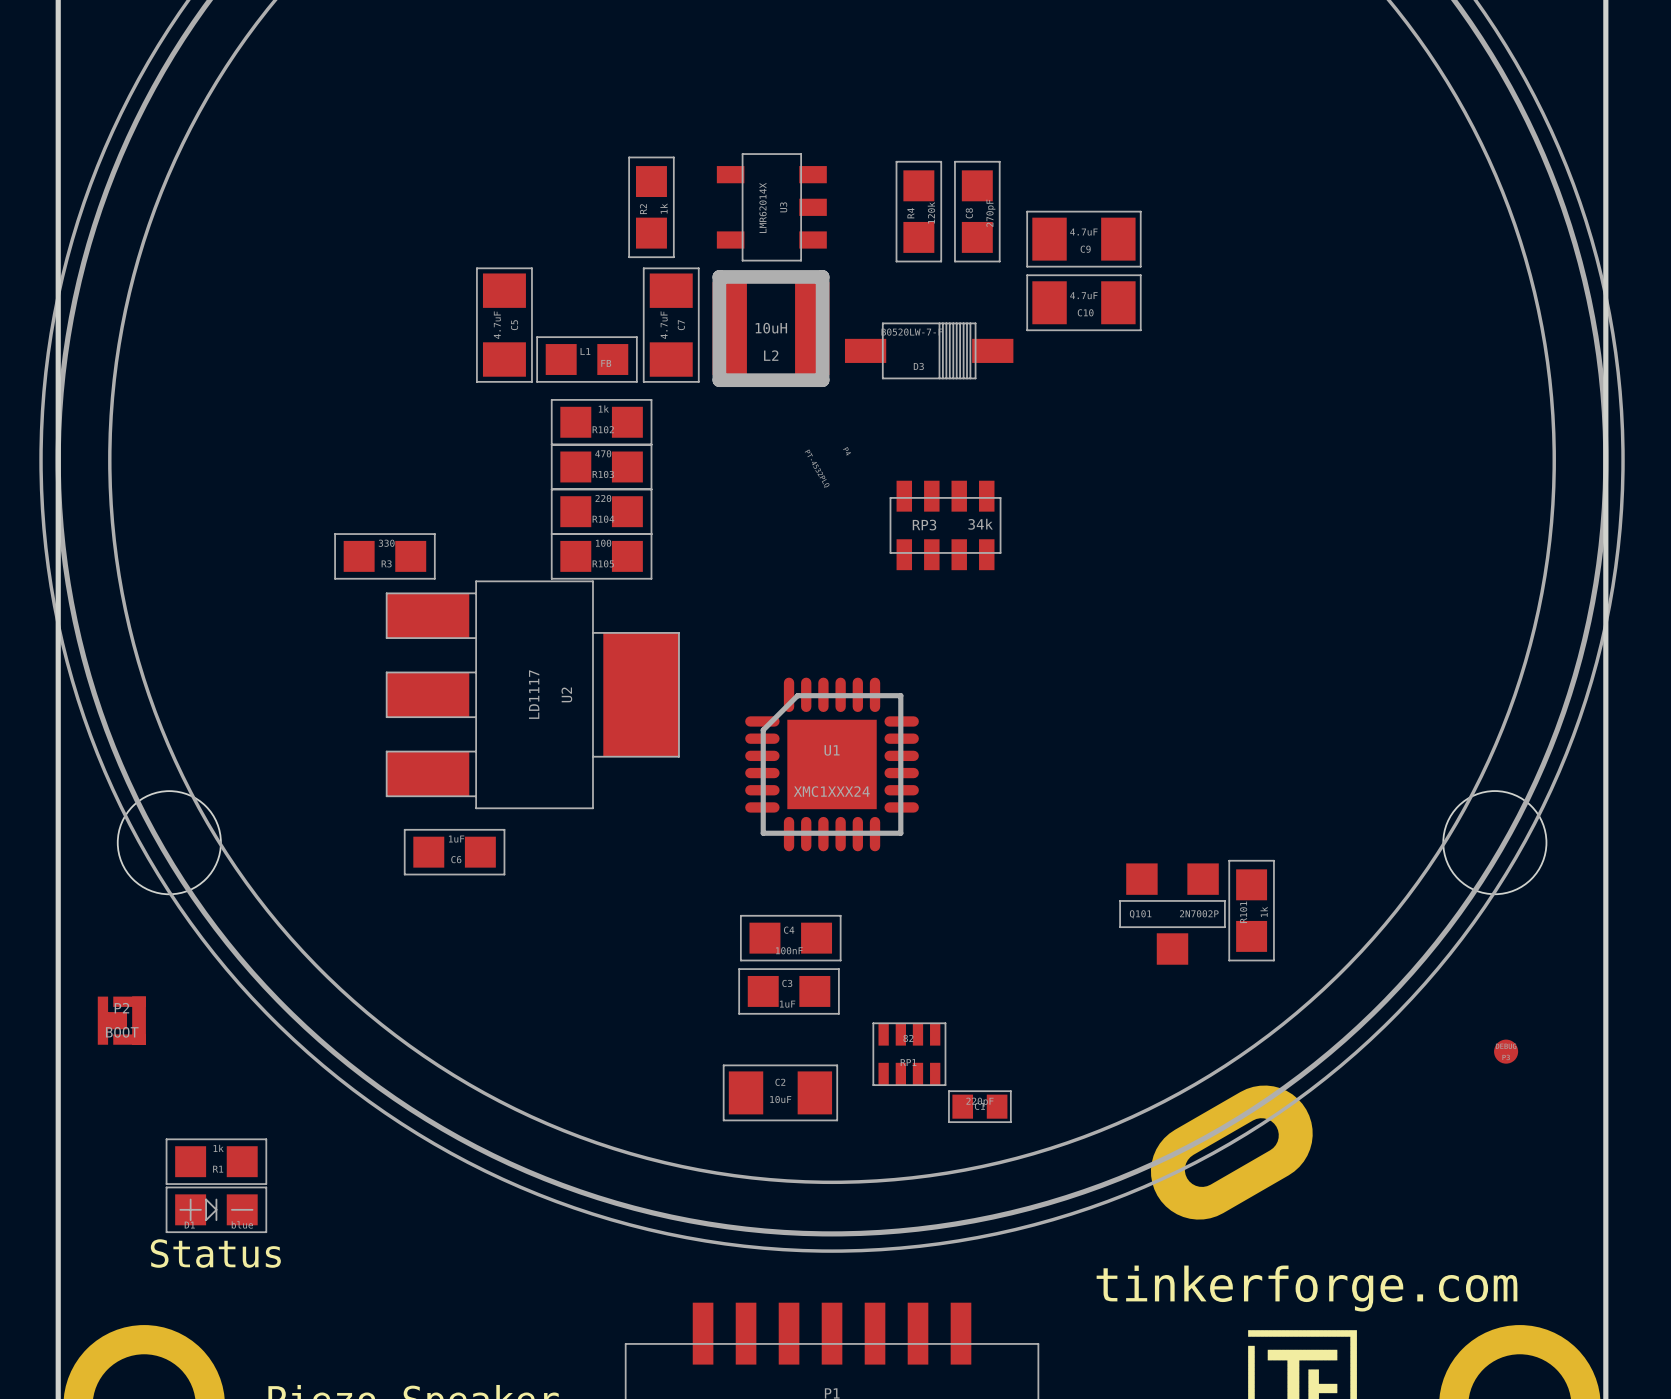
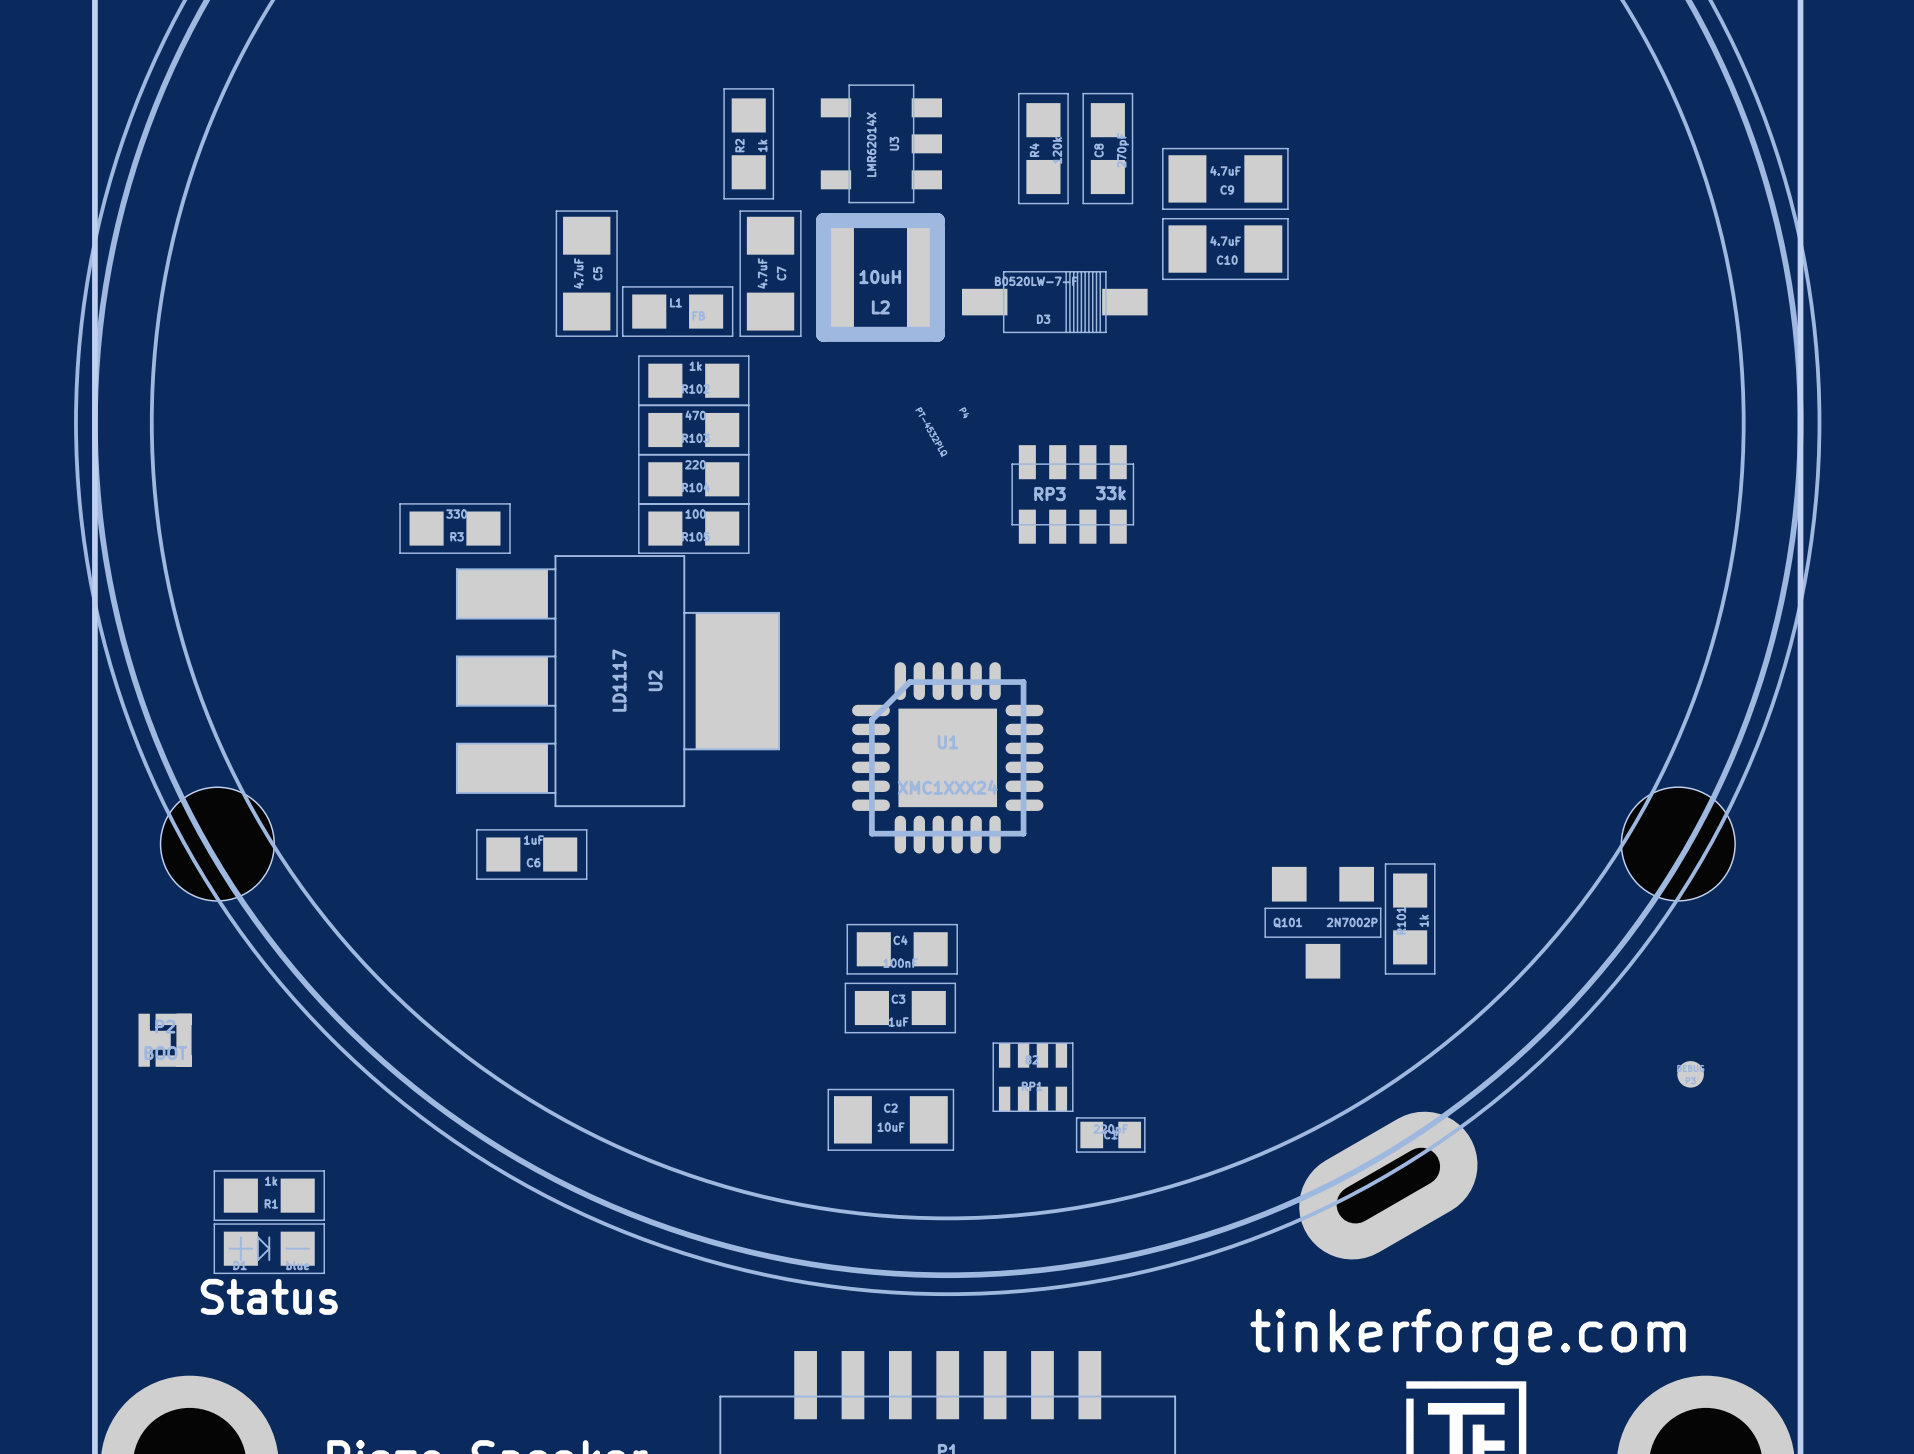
RP3 value: 34k (980, 524) -> 33k (1110, 493)

